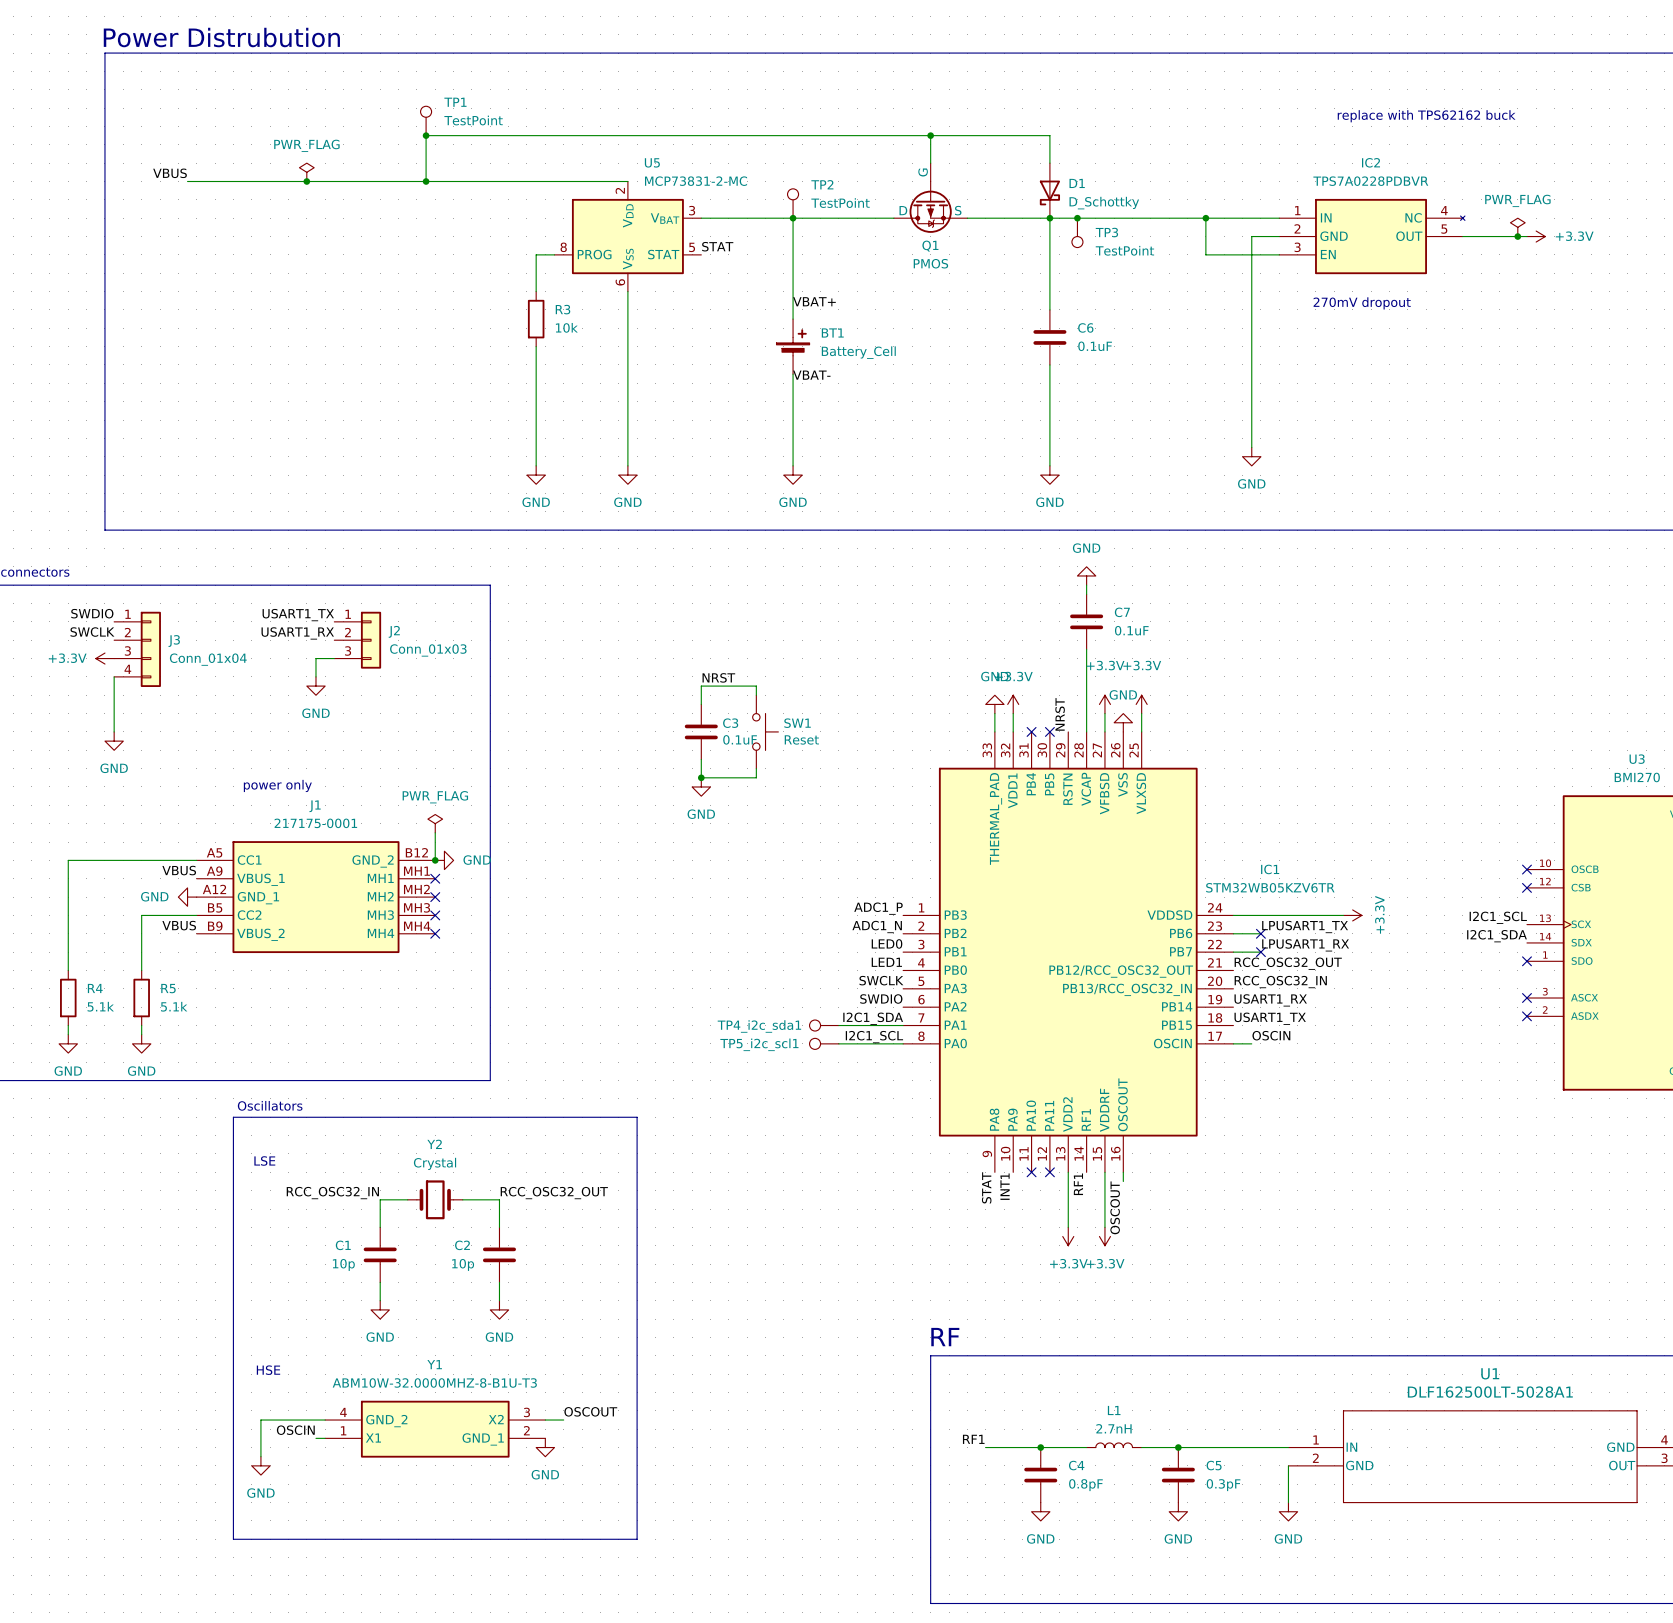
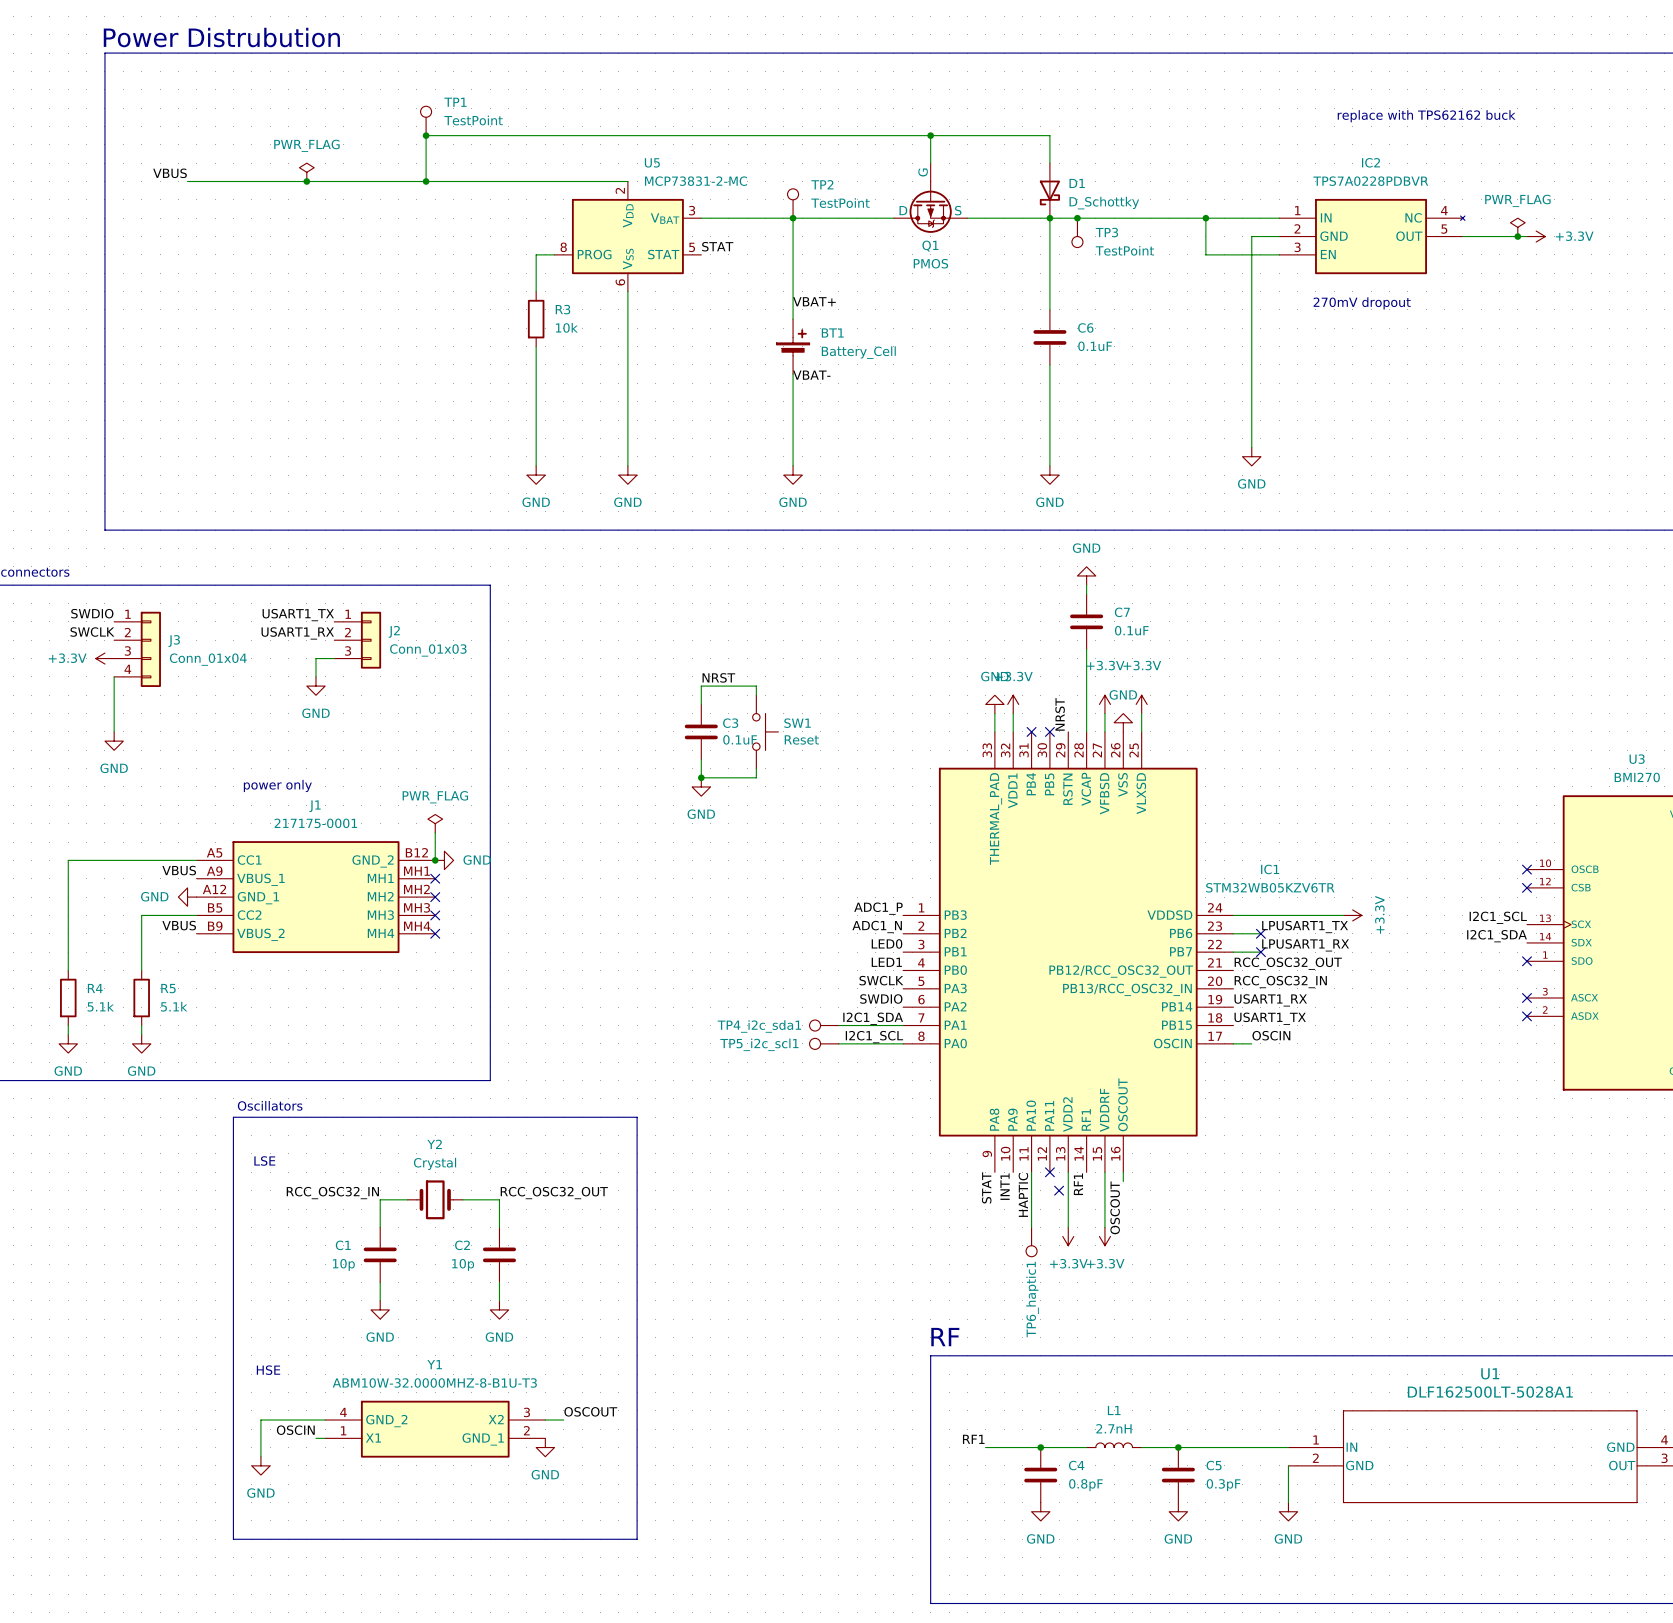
wire: none -> (1031, 1172) (1031, 1227)
no-connect mark position: (1031, 1172) -> (1059, 1190)
label: none -> HAPTIC (1023, 1194)
TP6_haptic1: none -> (1031, 1242)

